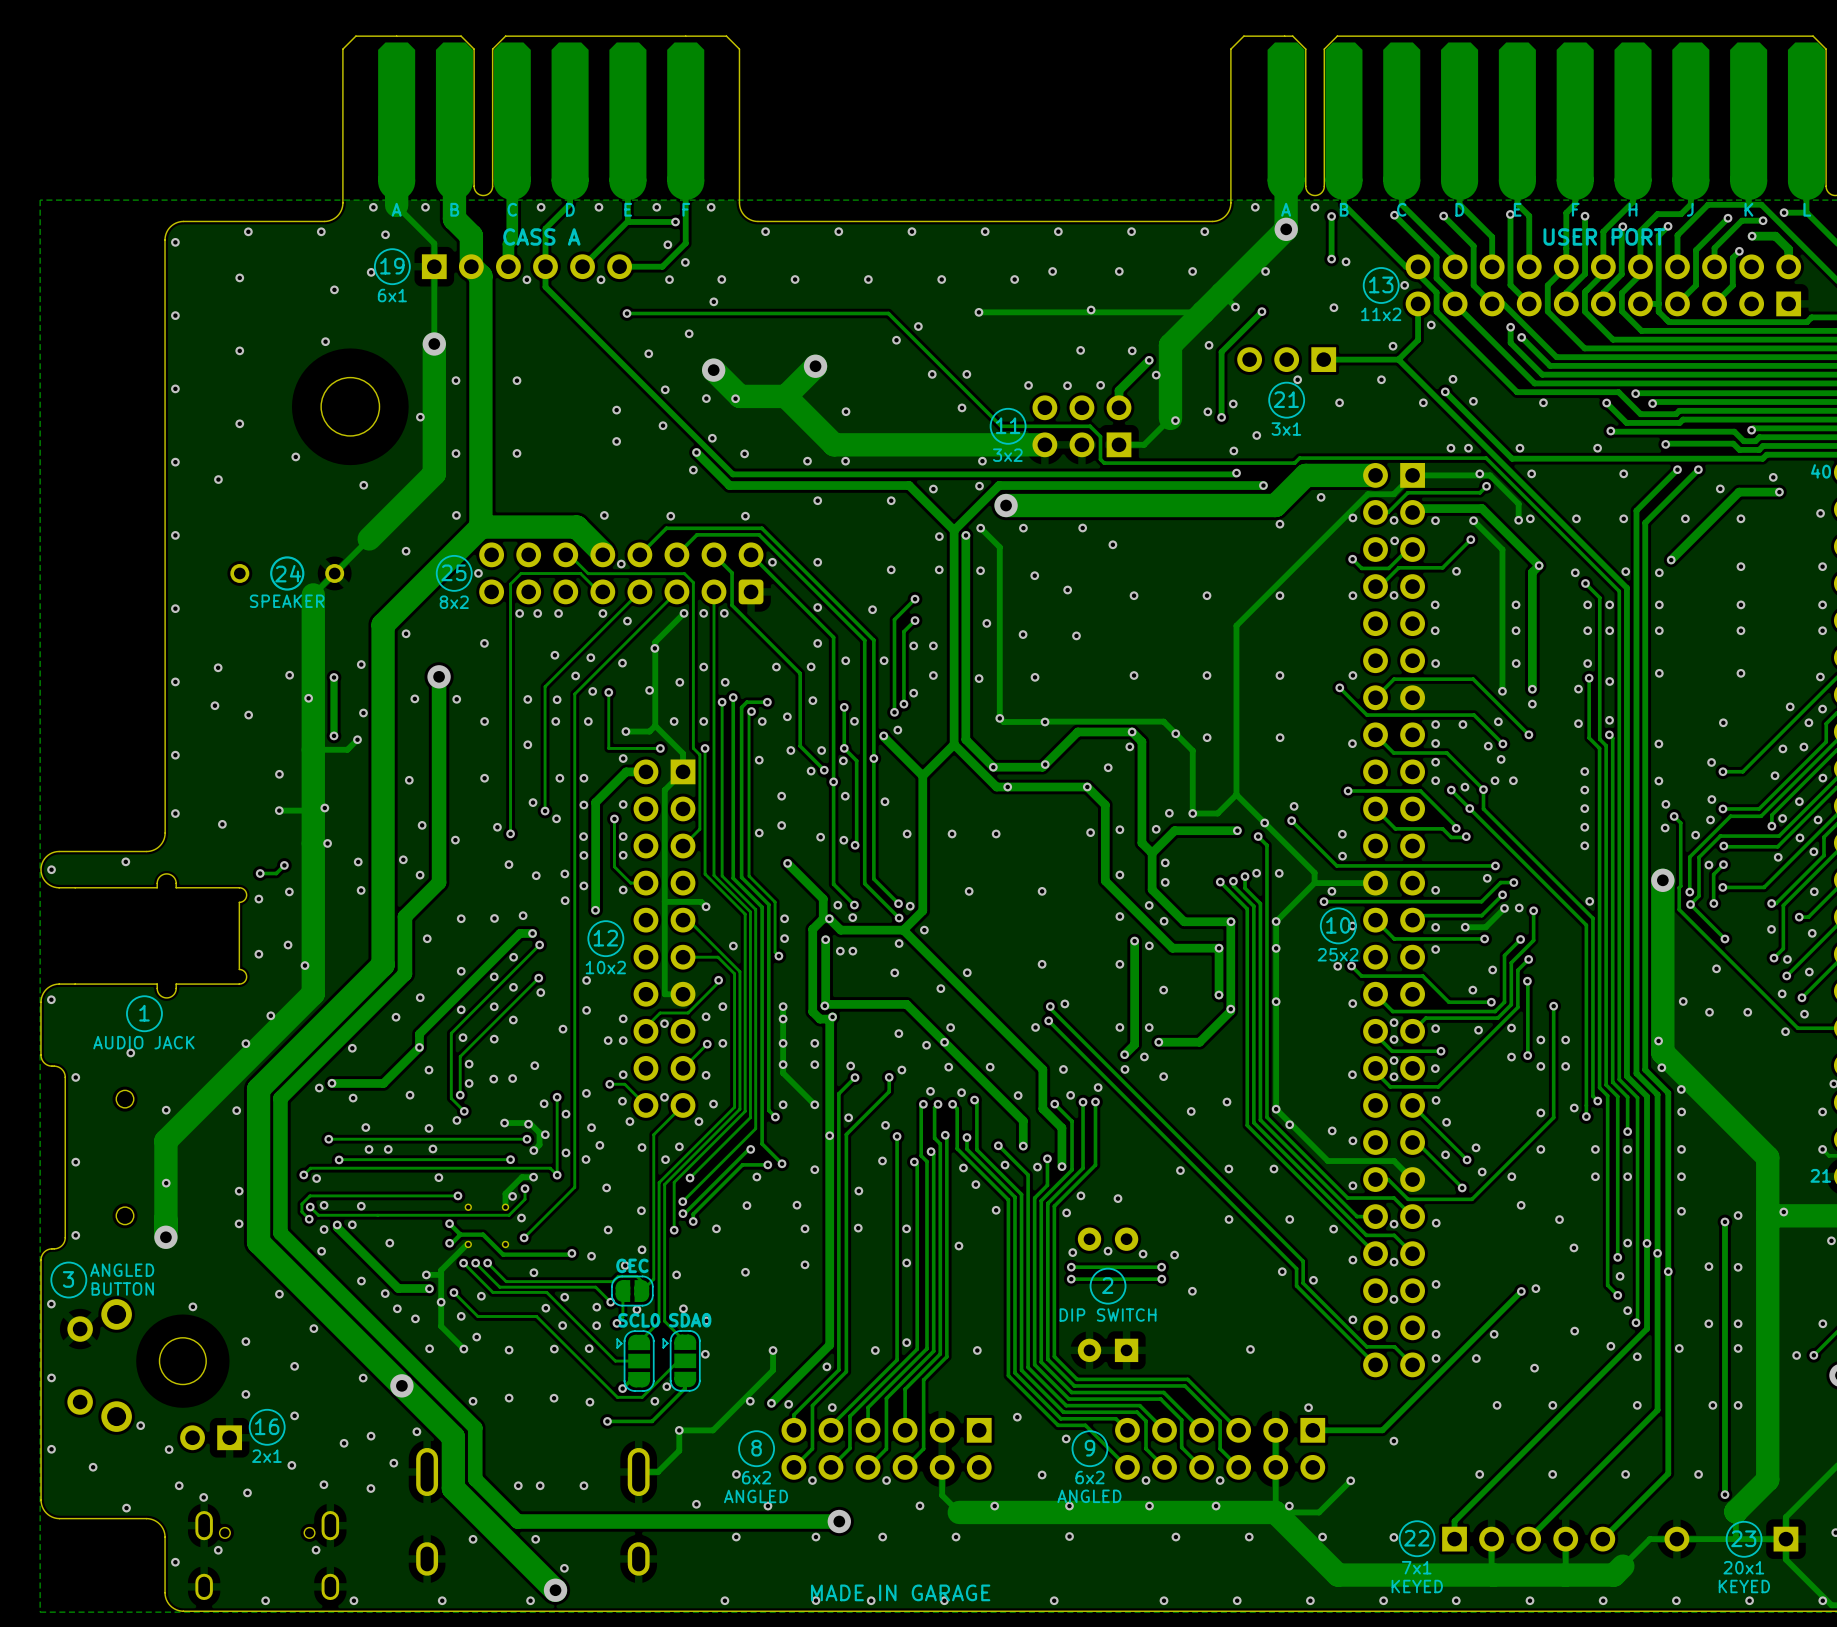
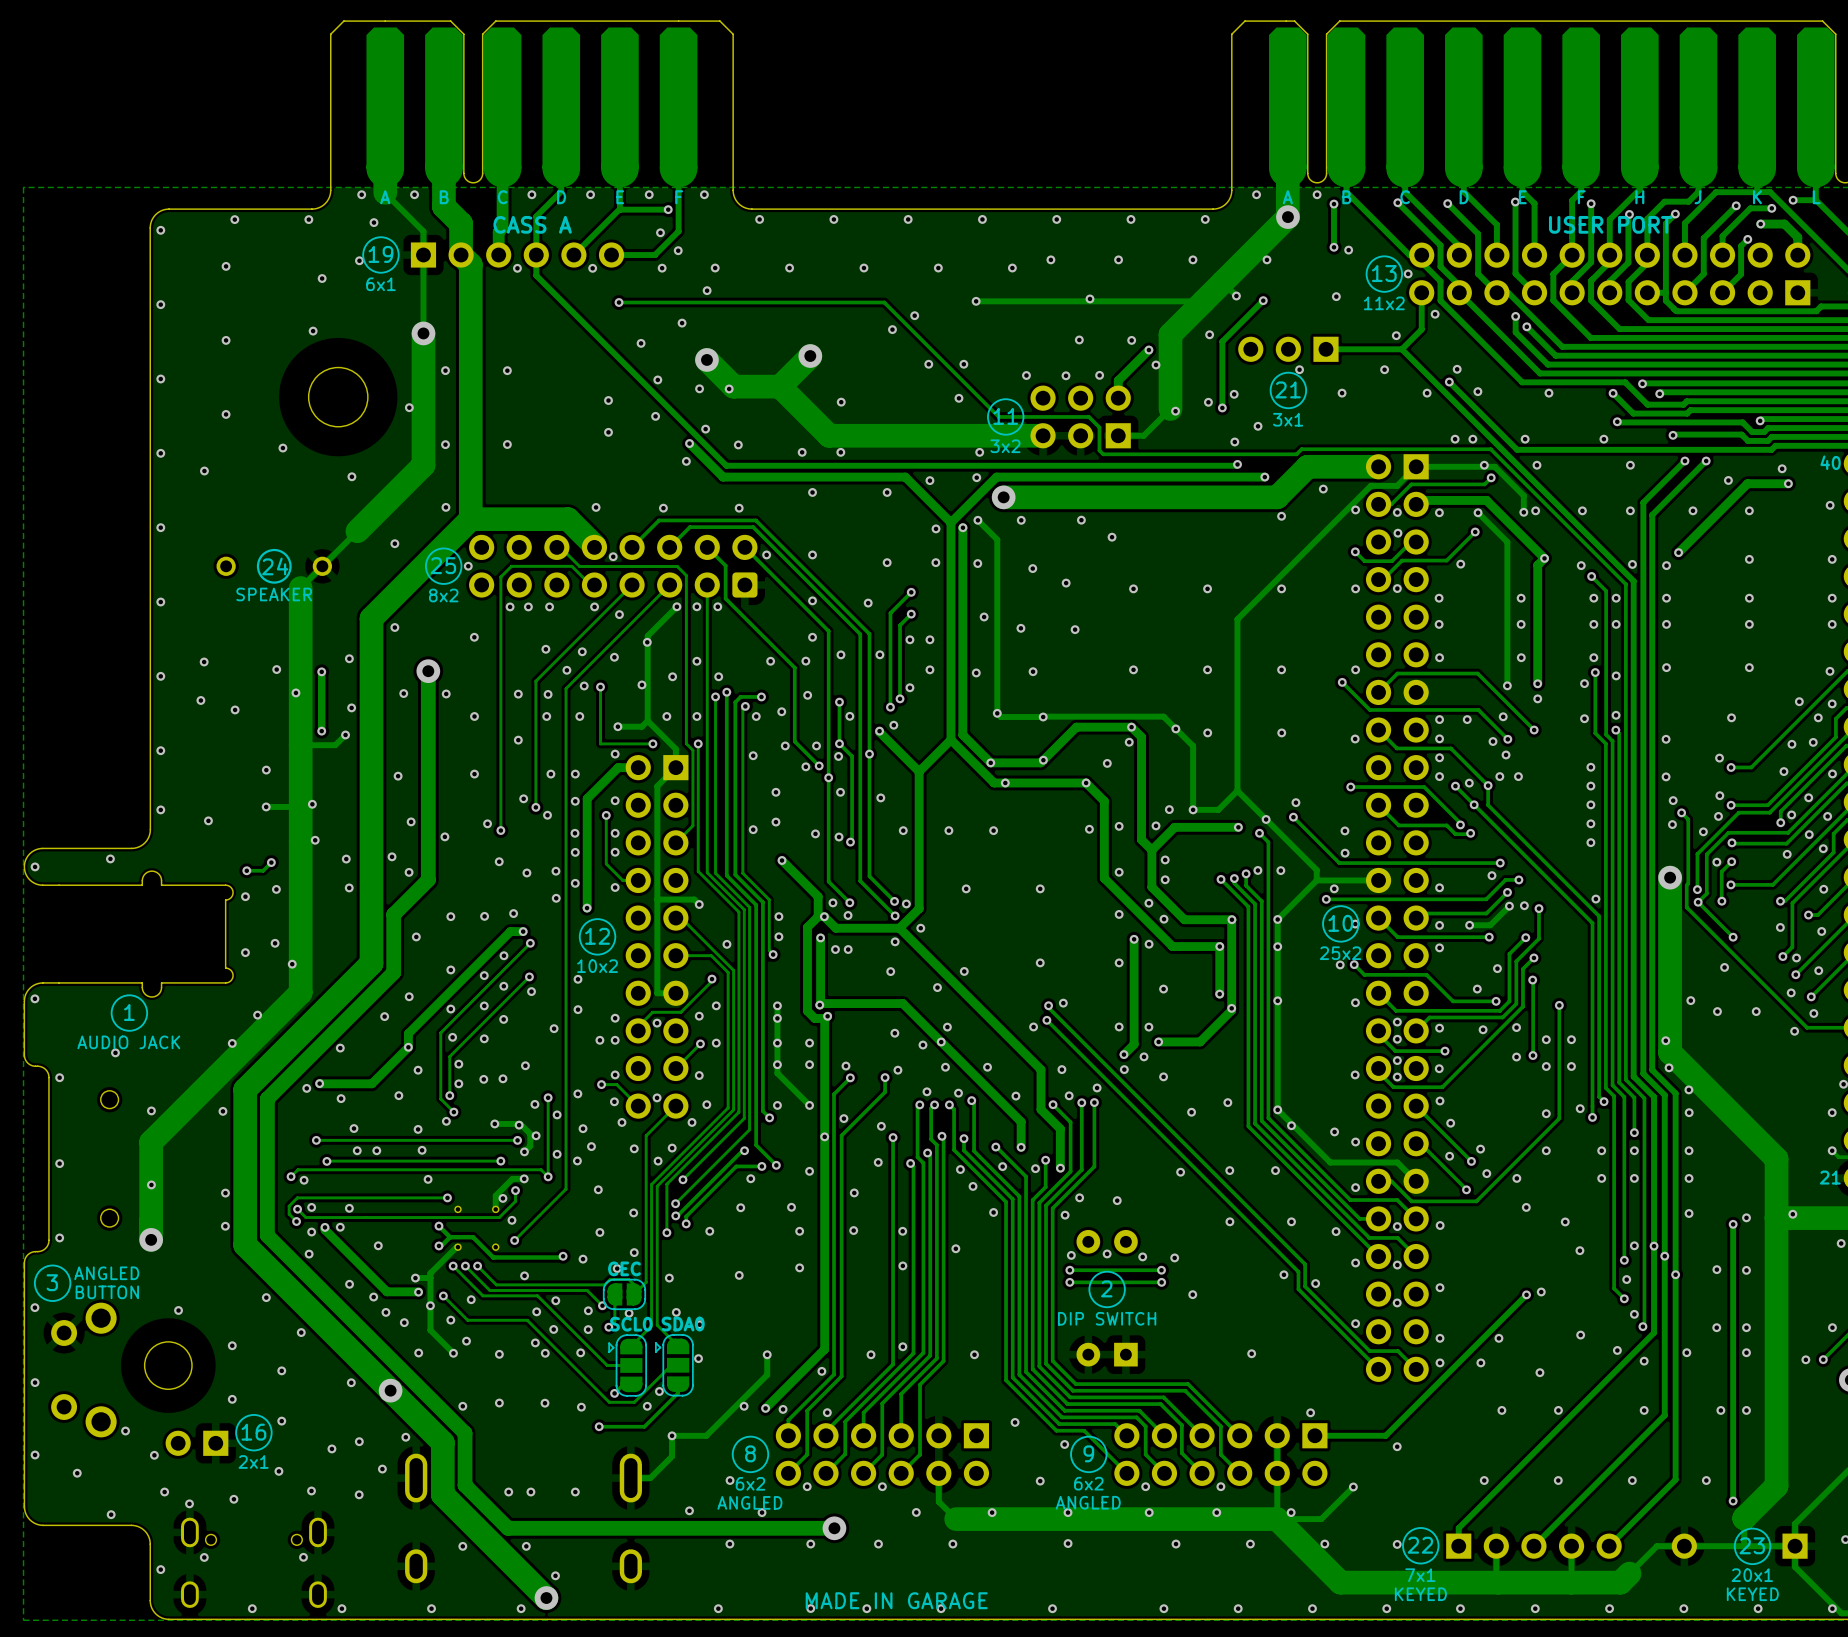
via: none -> (535, 1342)

